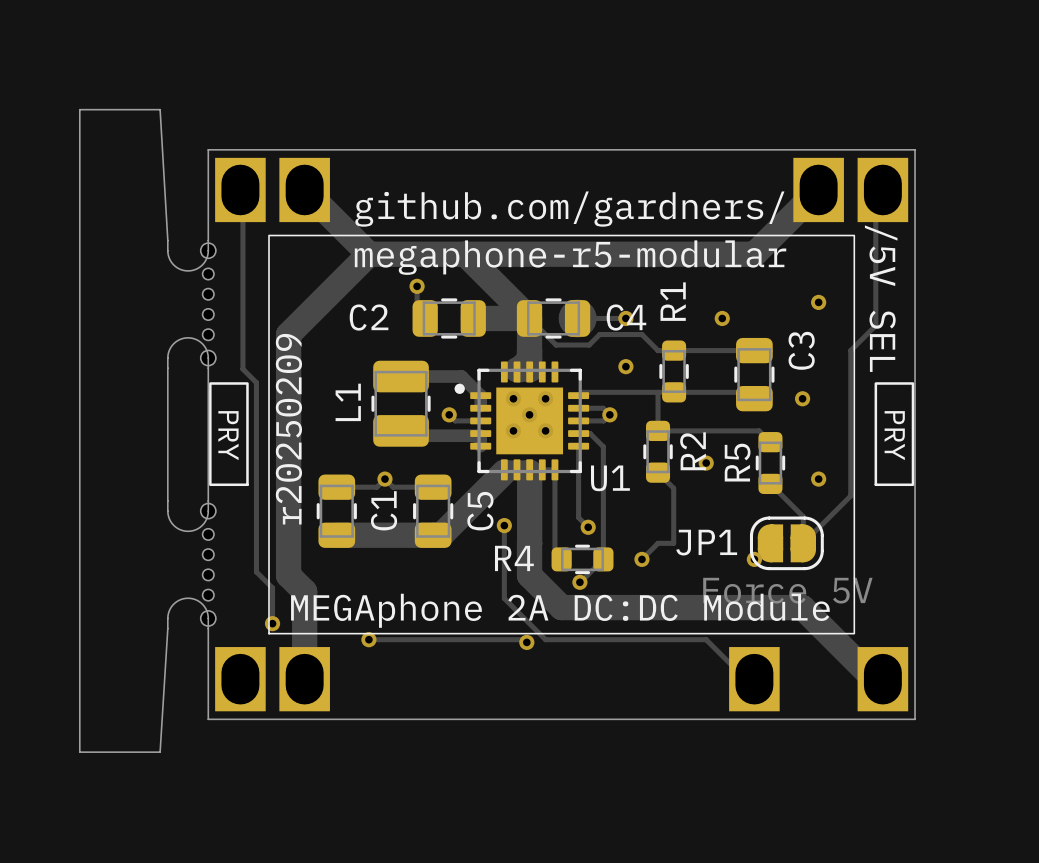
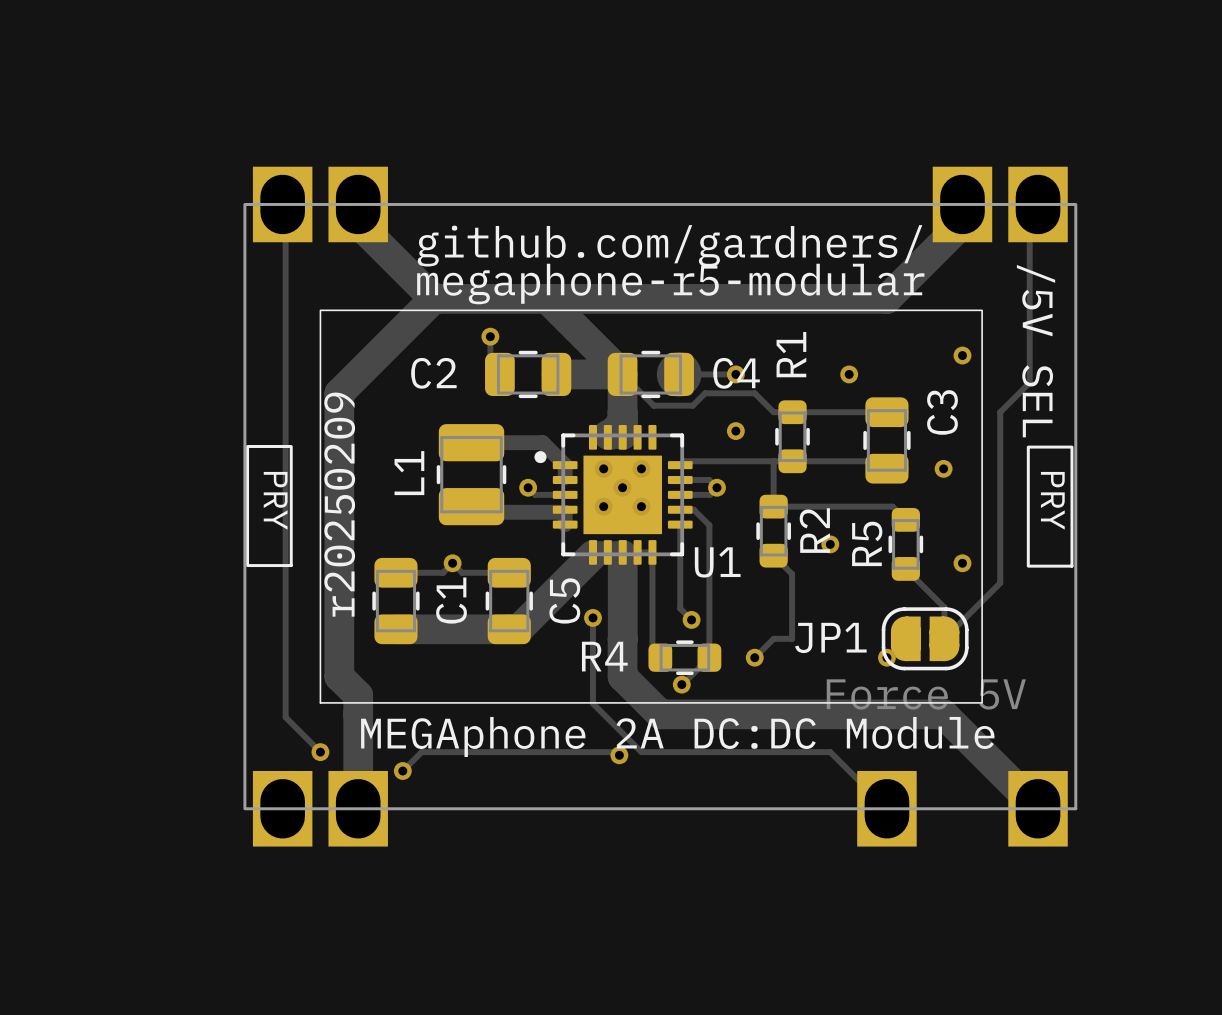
part footprint: [167, 149, 916, 720] -> [243, 166, 1078, 847]
board edge: (167, 240) (160, 109) (79, 109) (79, 752) (160, 752) (167, 628) -> none
text position: megaphone-r5-modular (570, 257) -> megaphone-r5-modular (670, 284)
board edge: (167, 368) (167, 500) -> none
track: (242, 369) (256, 382) (256, 571) (272, 588) (272, 623) -> (285, 434) (285, 717) (320, 752)
text position: MEGAphone 2A DC:DC Module (560, 610) -> MEGAphone 2A DC:DC Module (677, 736)
via position: (272, 623) -> (320, 752)
track: none -> (433, 752) (421, 752) (402, 771)
via position: (368, 639) -> (402, 771)

